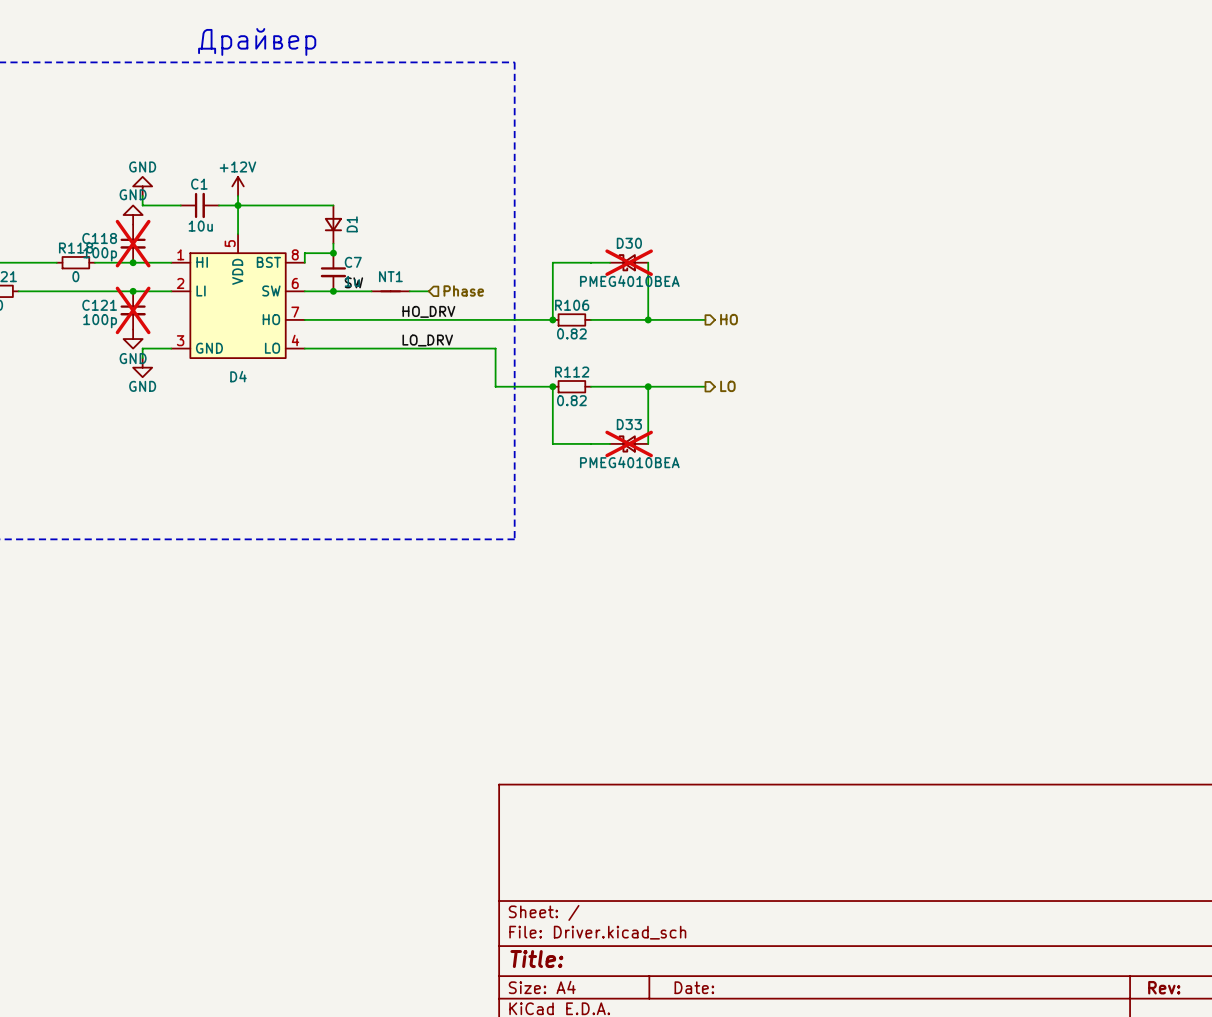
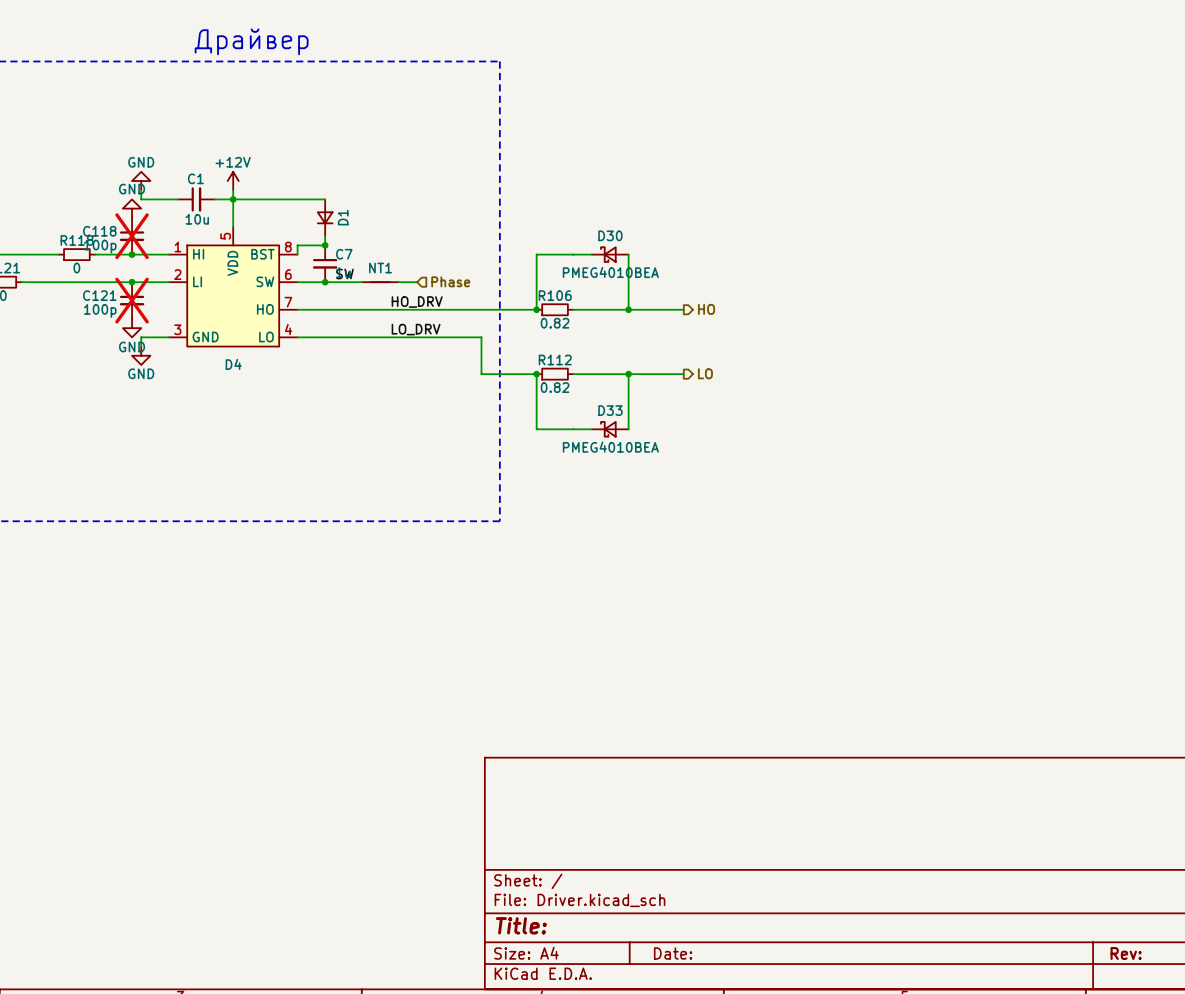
D30 do-not-place cross: (629, 262) -> none
D33 do-not-place cross: (629, 443) -> none

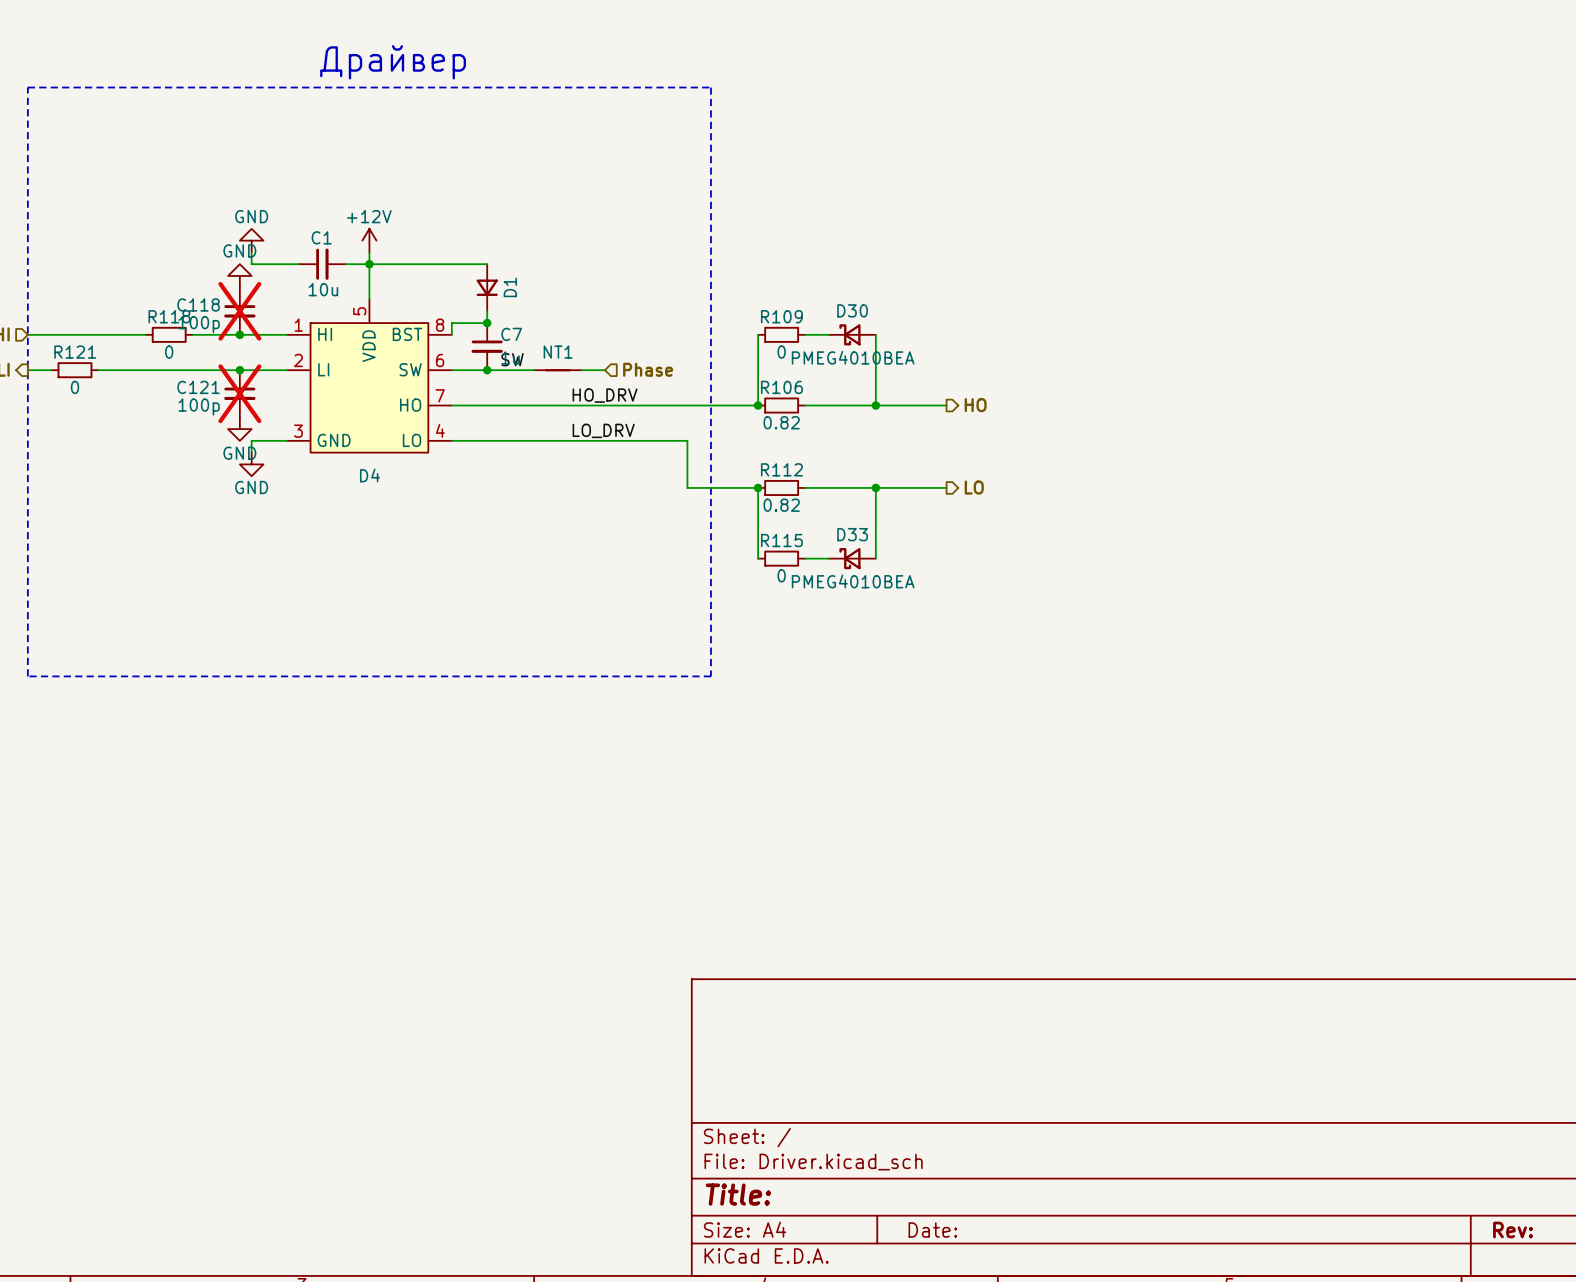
wire: (536, 254) (573, 254) -> none
R109: none -> 0 (781, 334)
wire: (536, 429) (573, 429) -> none
R115: none -> 0 (781, 558)

